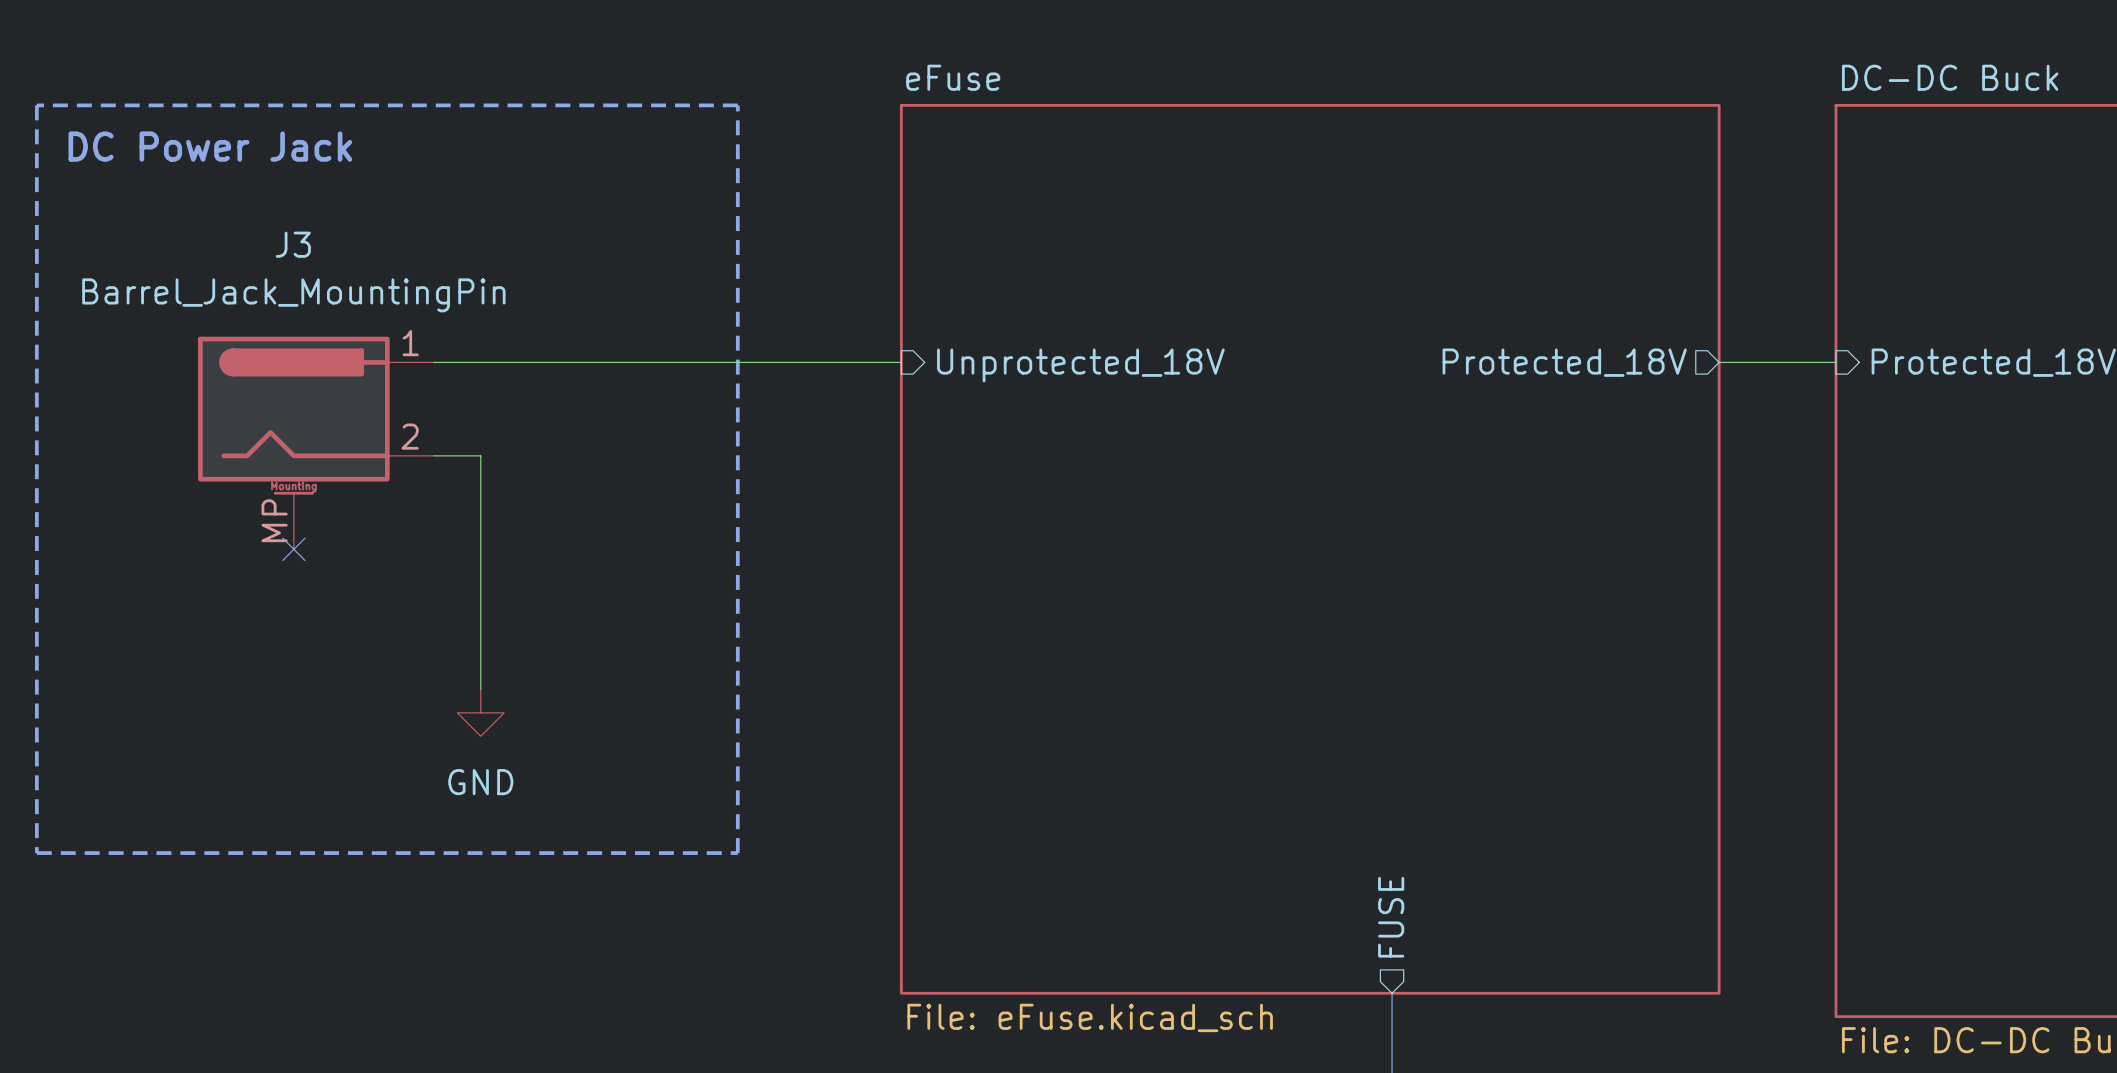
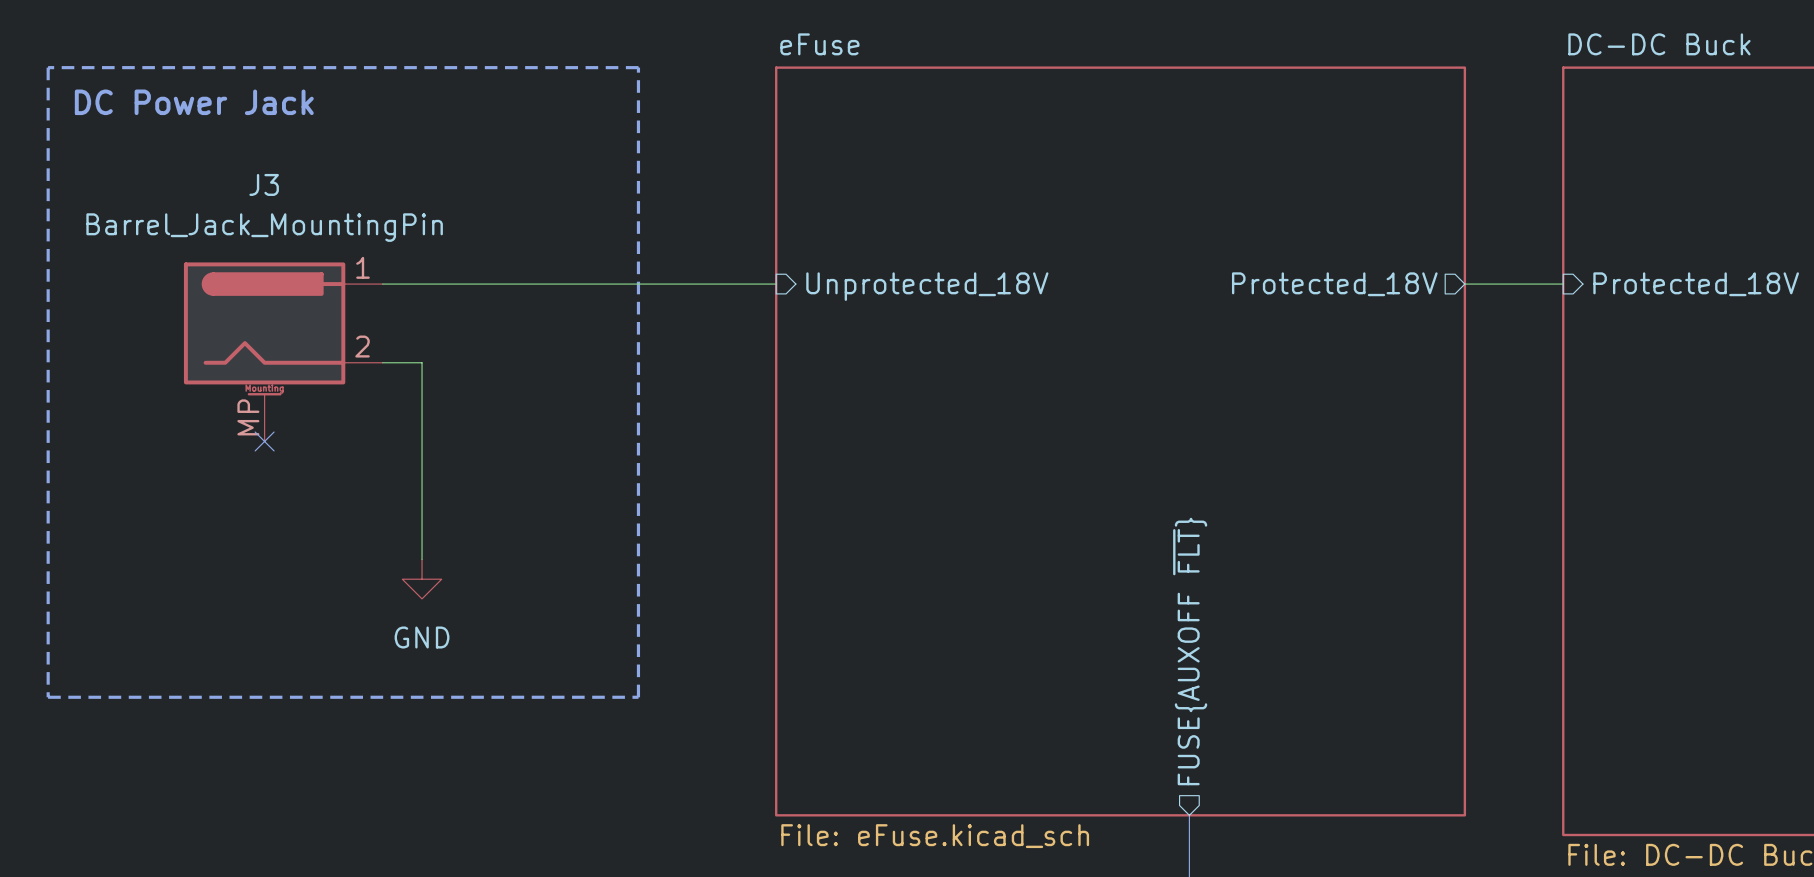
sheet pin: FUSE (1391, 917) -> FUSE{AUXOFF ~{FLT}} (1190, 651)

